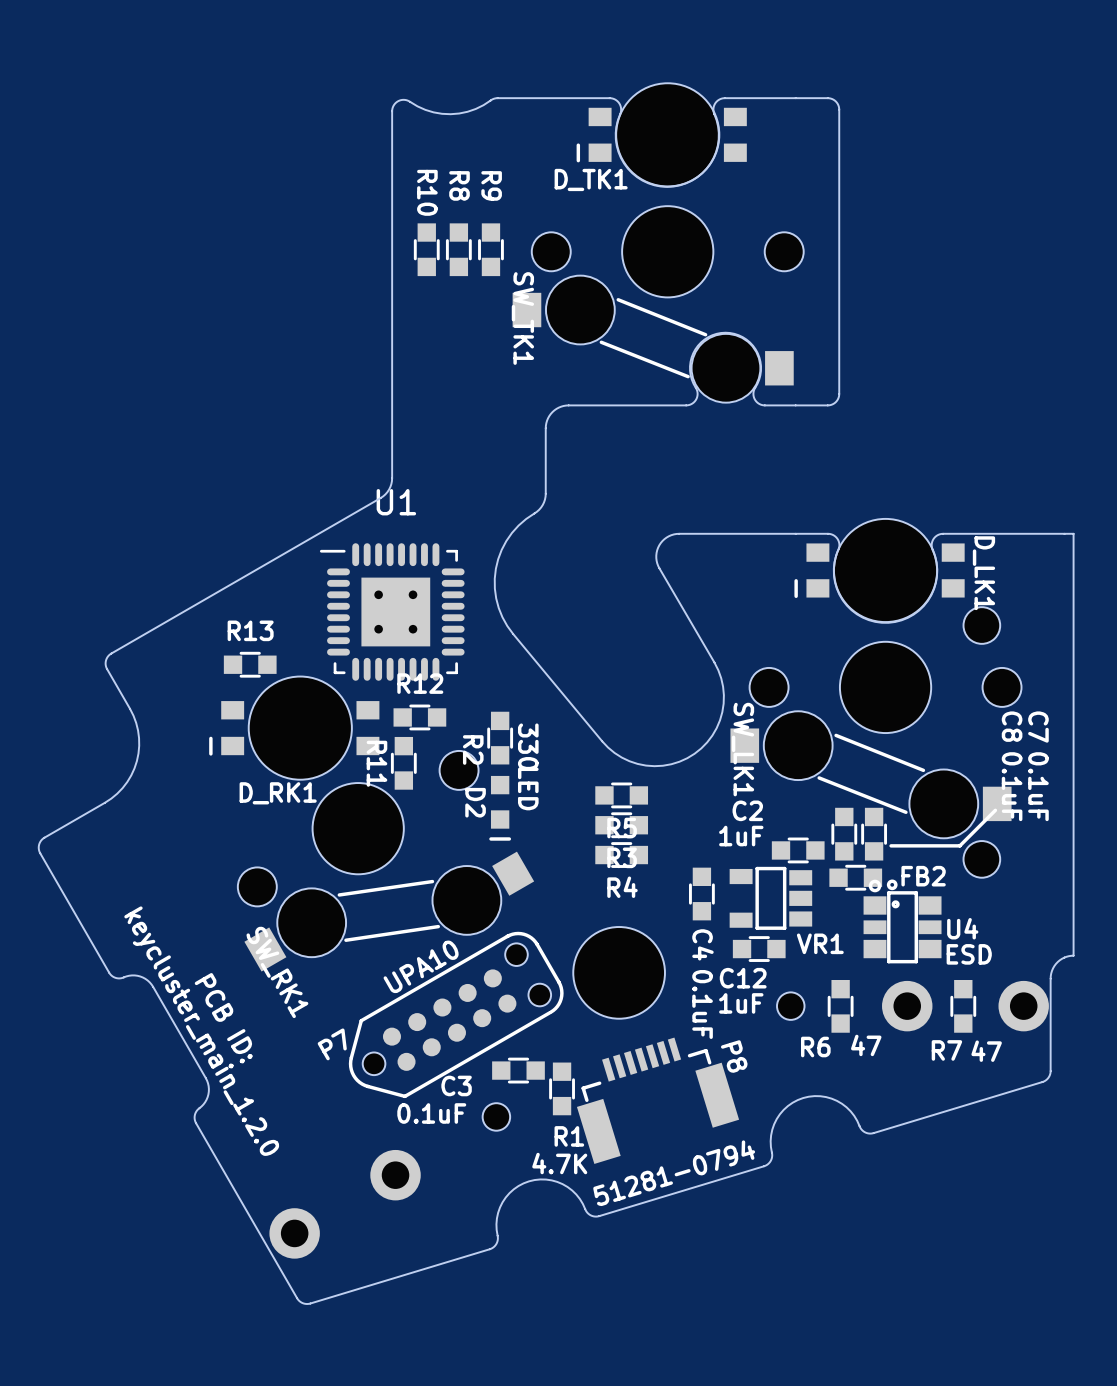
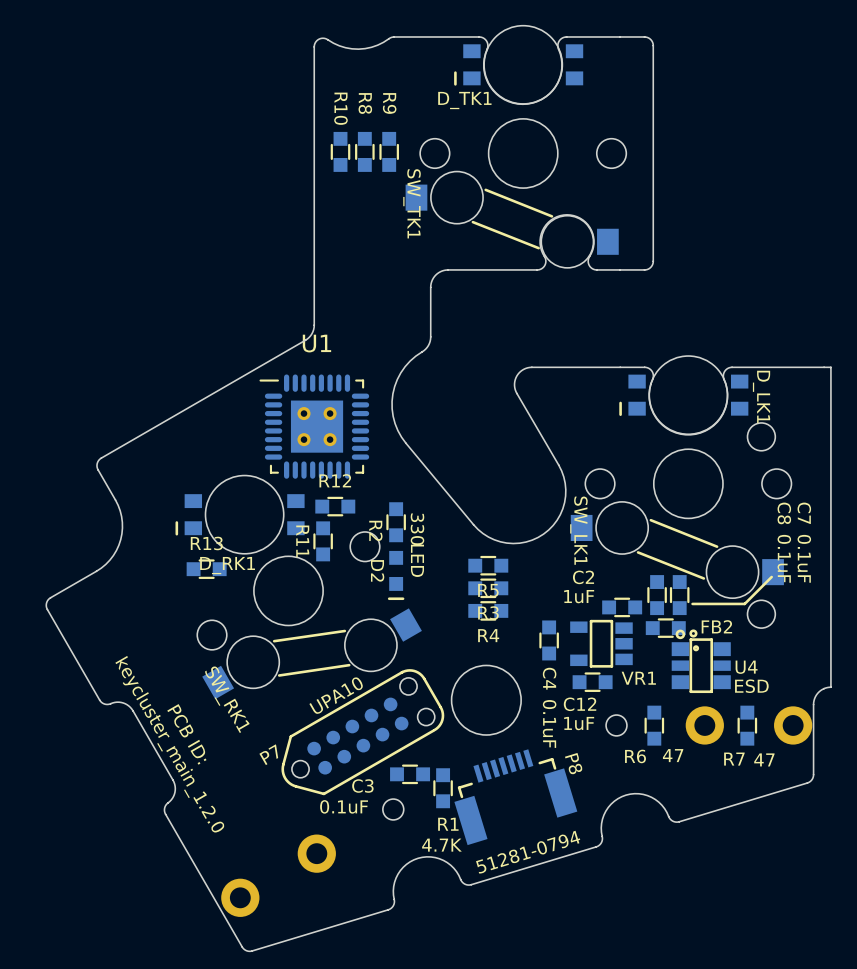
R13 position: (250, 664) -> (206, 569)

